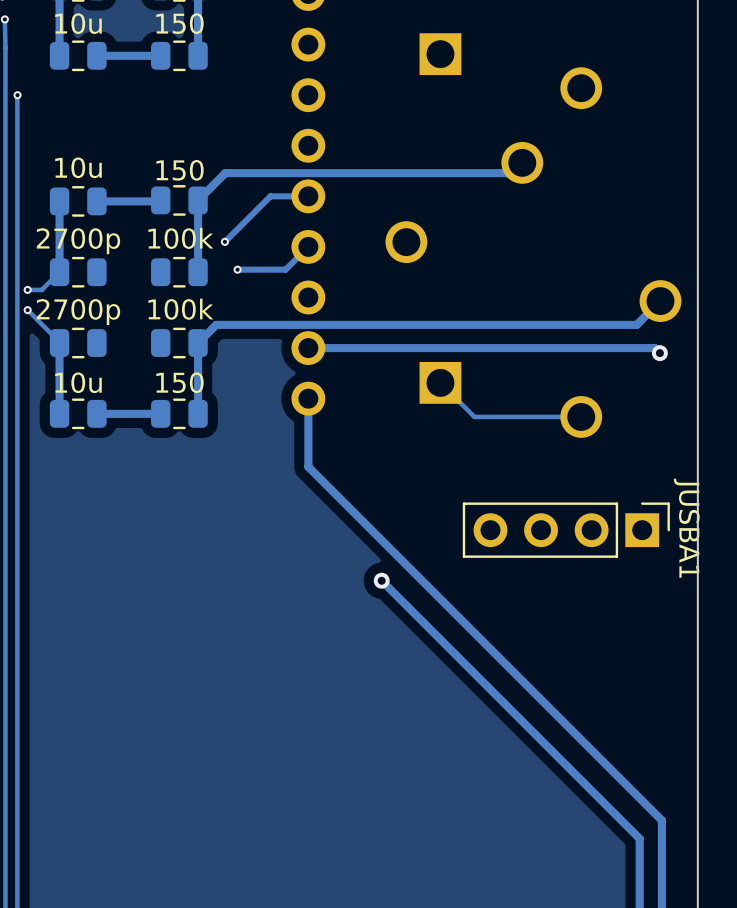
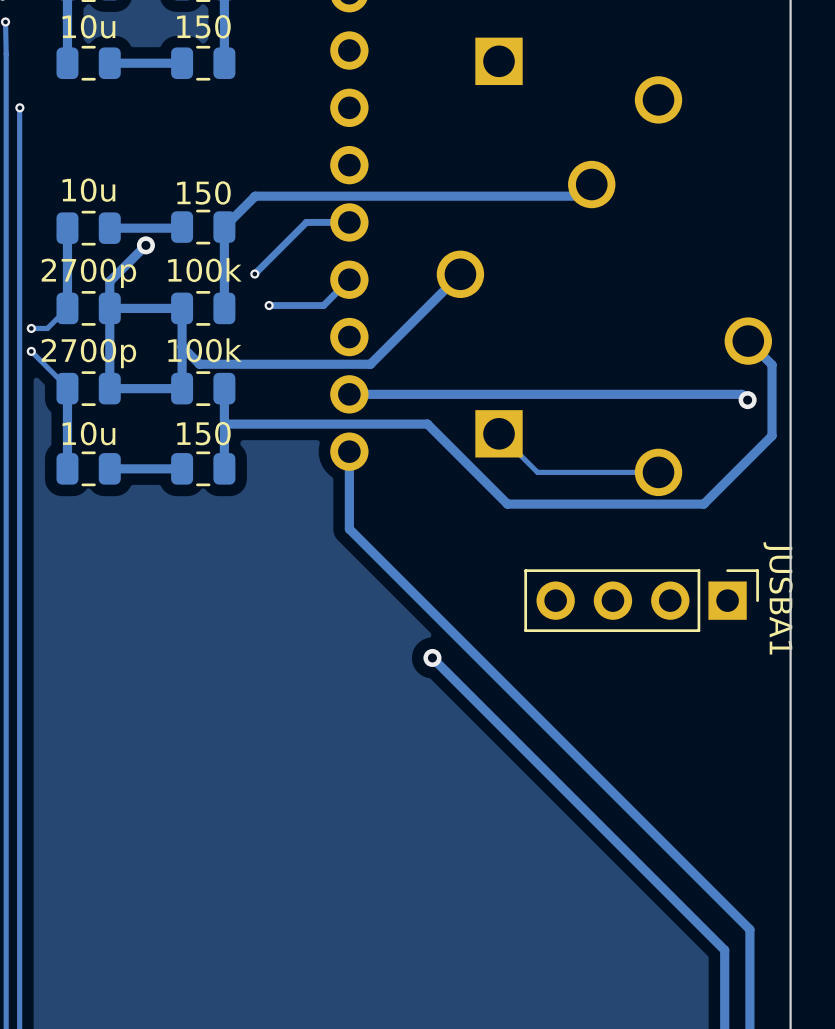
track: none -> (145, 245) (109, 281) (109, 388) (182, 388) (182, 308) (109, 308)
via: none -> (145, 245)
track: none -> (460, 274) (370, 364) (199, 364) (182, 346)
track: (660, 301) (636, 324) (216, 324) (198, 343) -> (748, 341) (772, 364) (772, 435) (703, 504) (507, 504) (427, 424) (224, 424)

